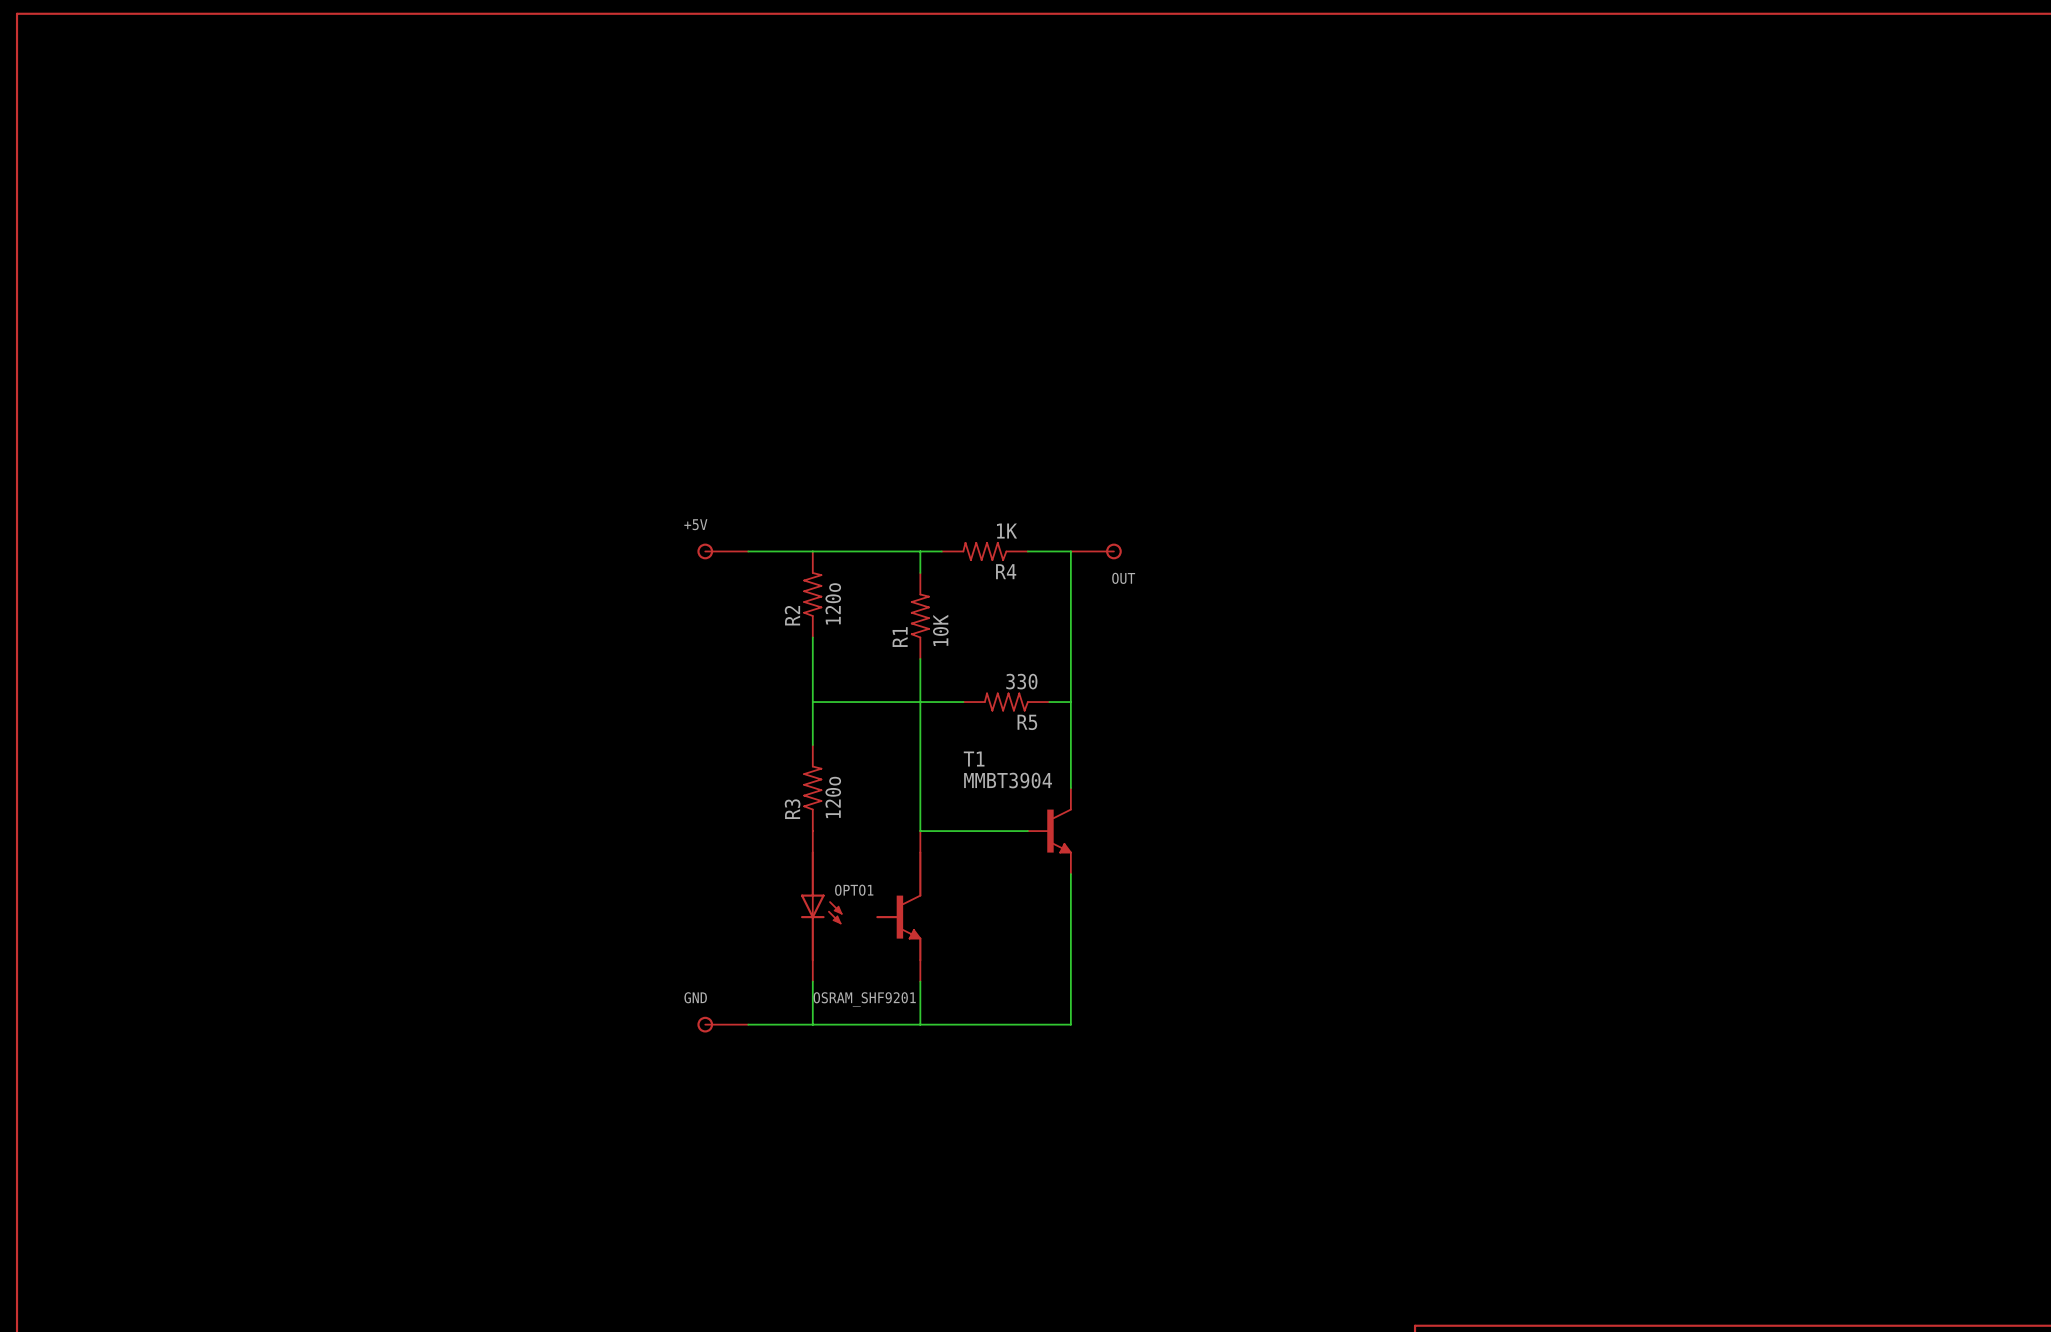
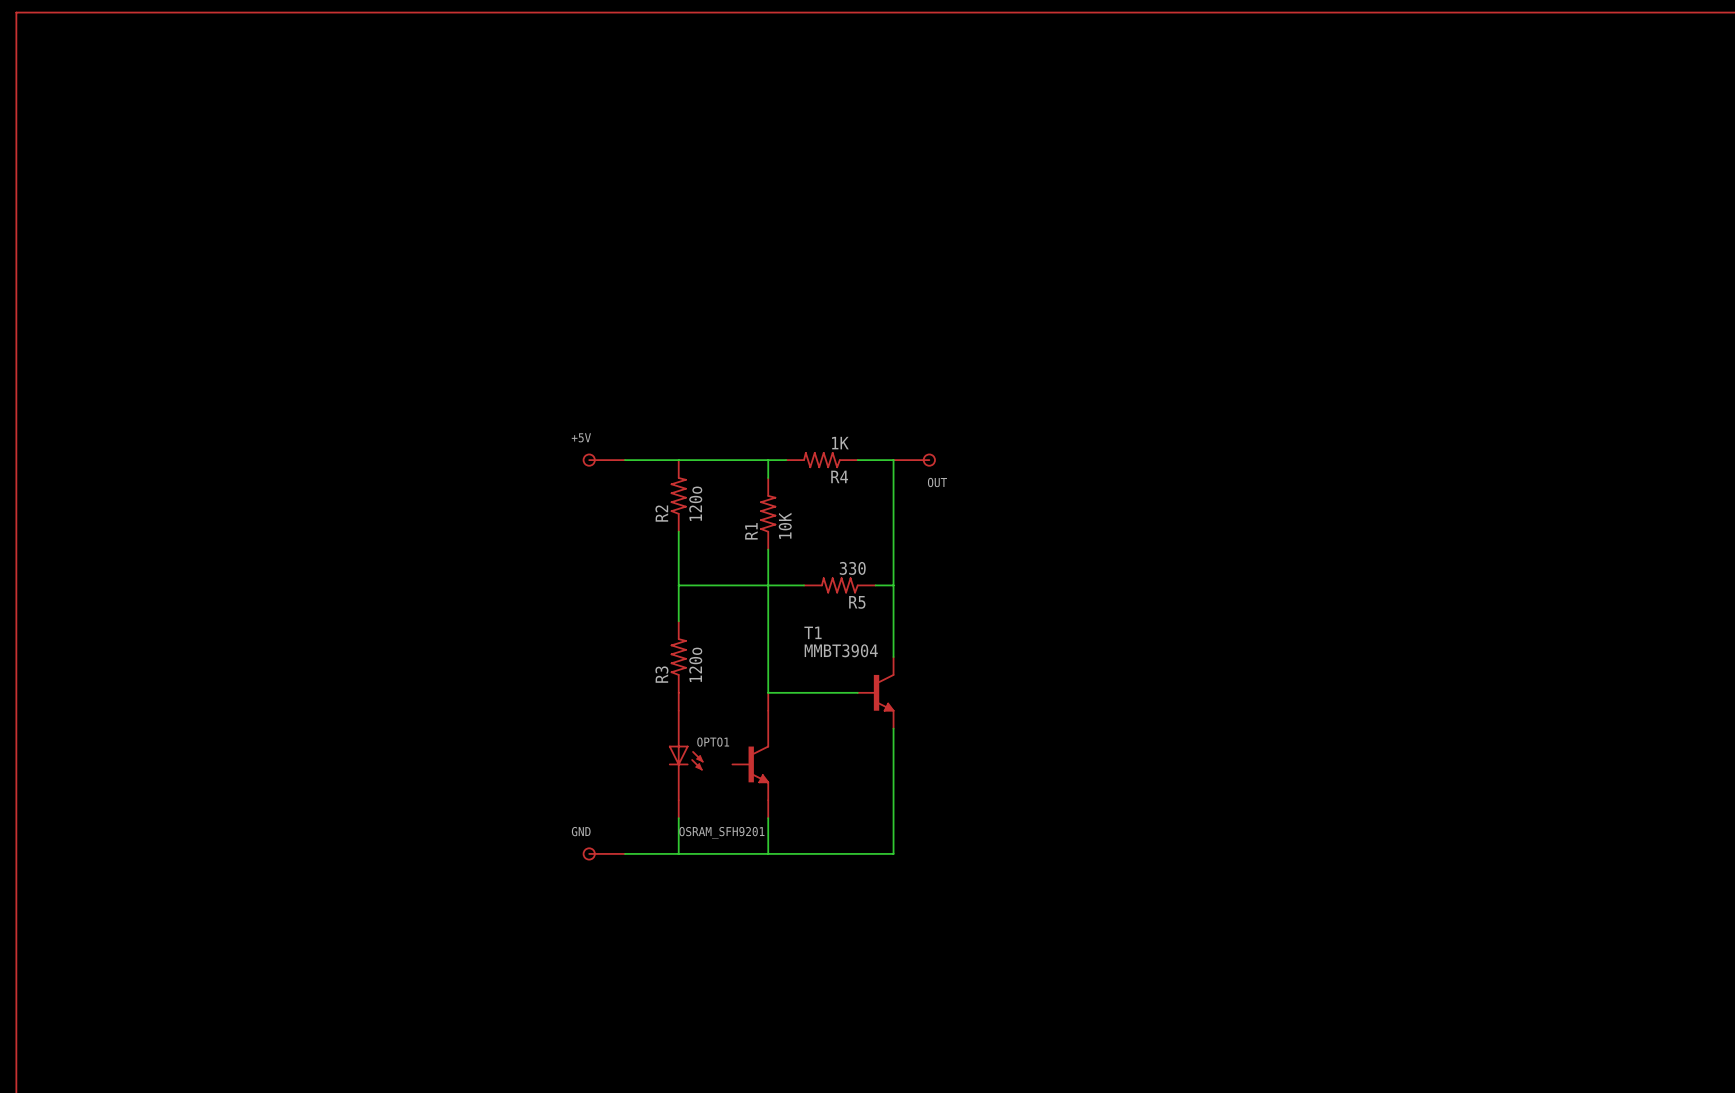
OPTO1 value: OSRAM_SHF9201 (864, 999) -> OSRAM_SFH9201 (721, 832)

